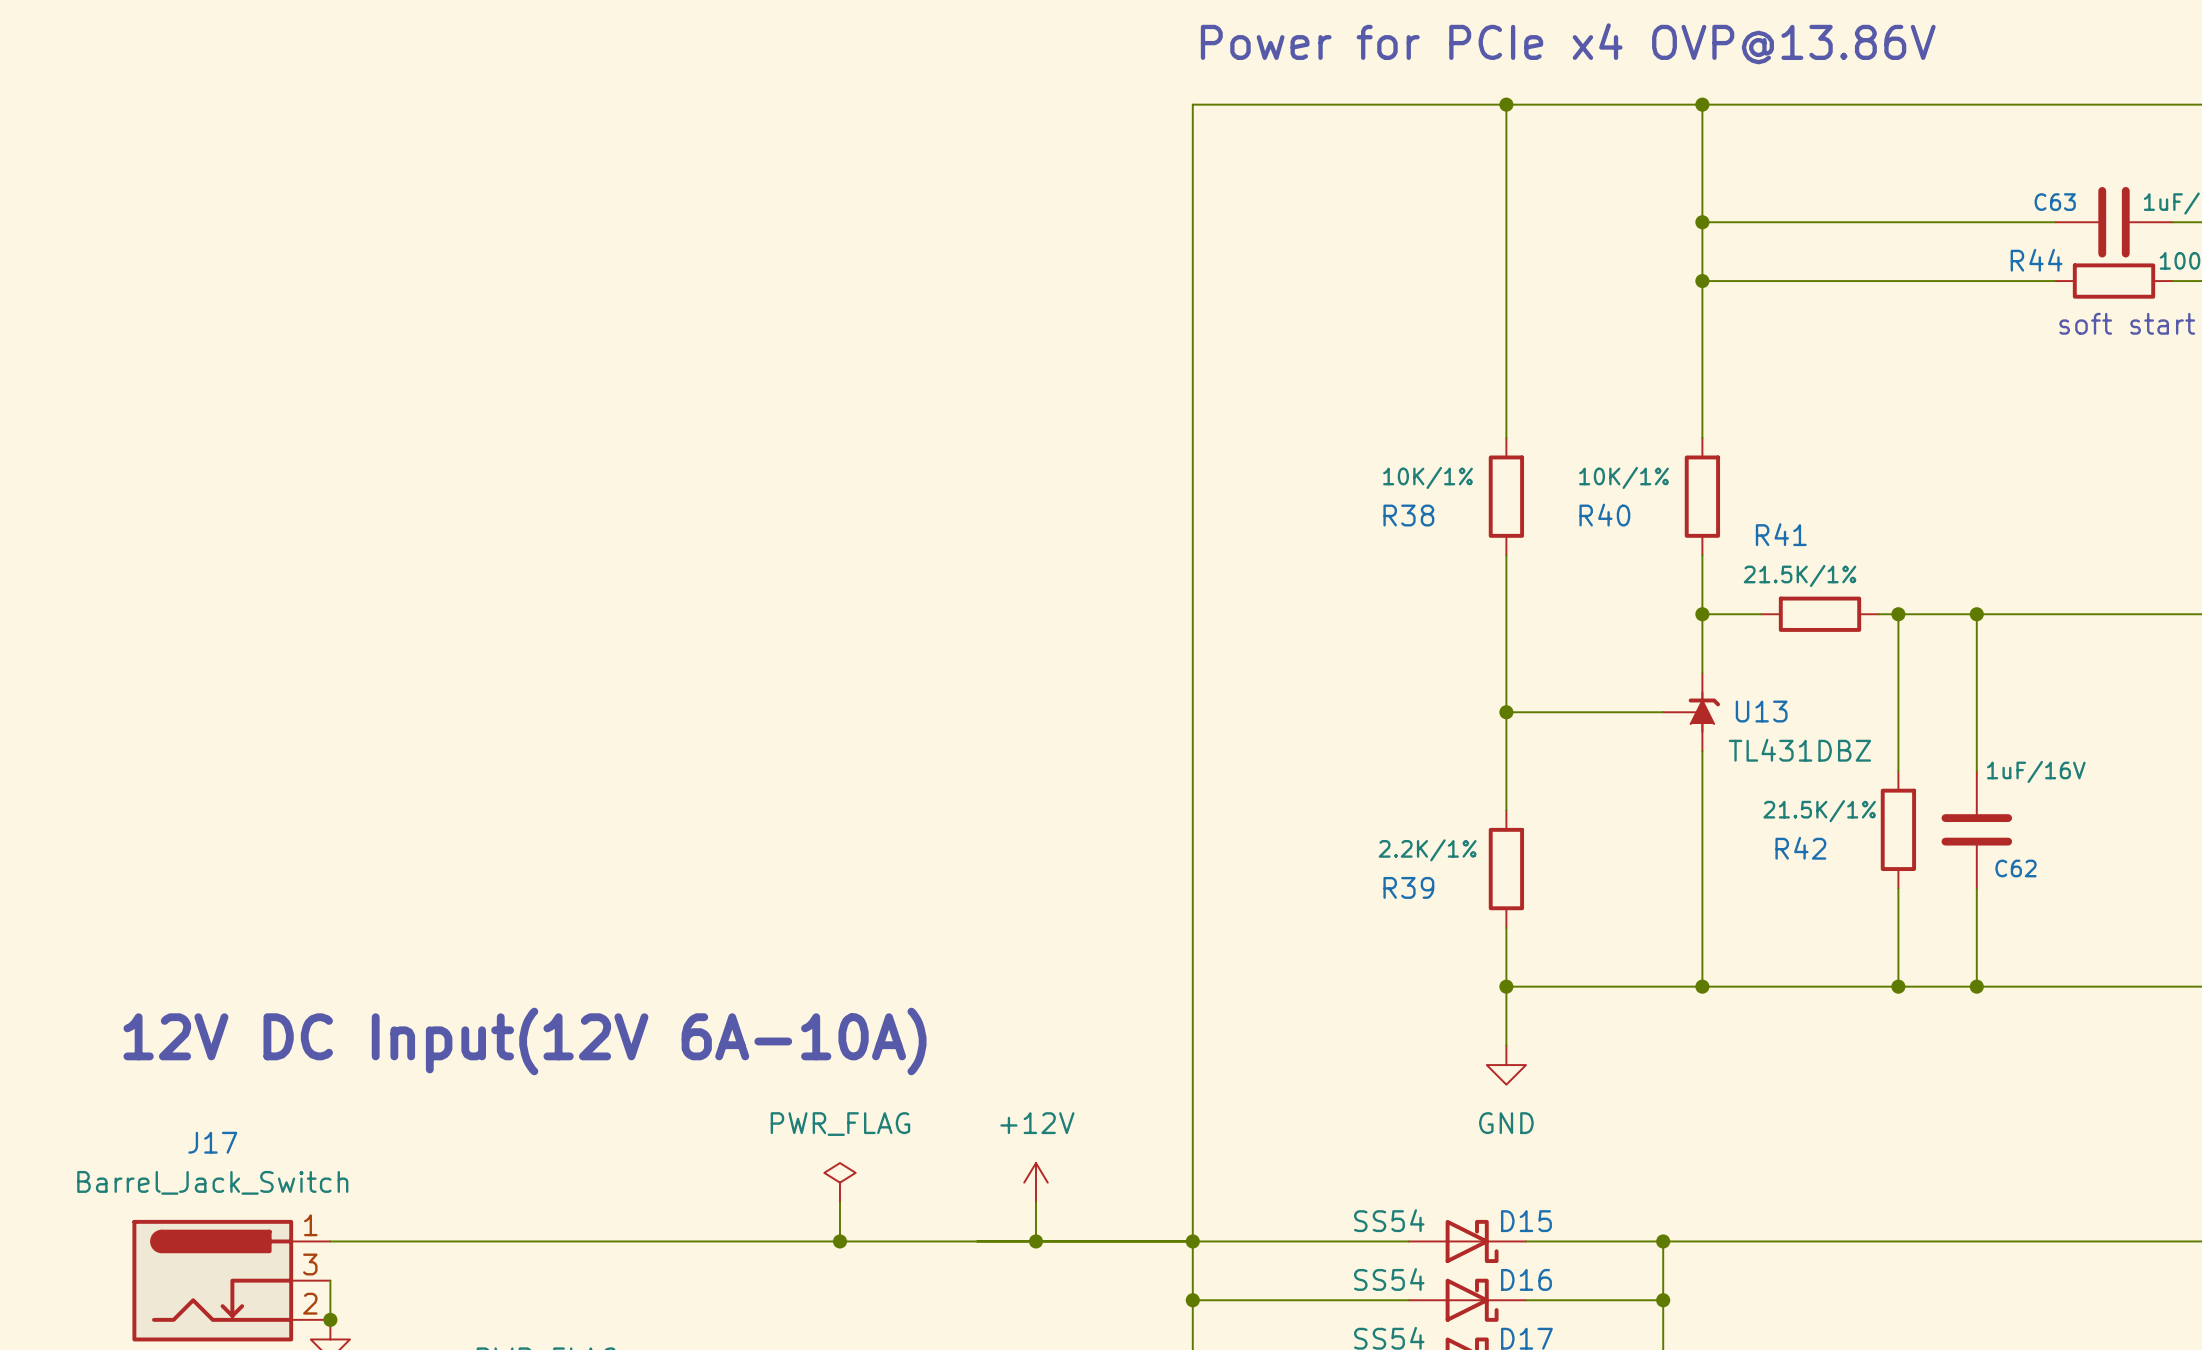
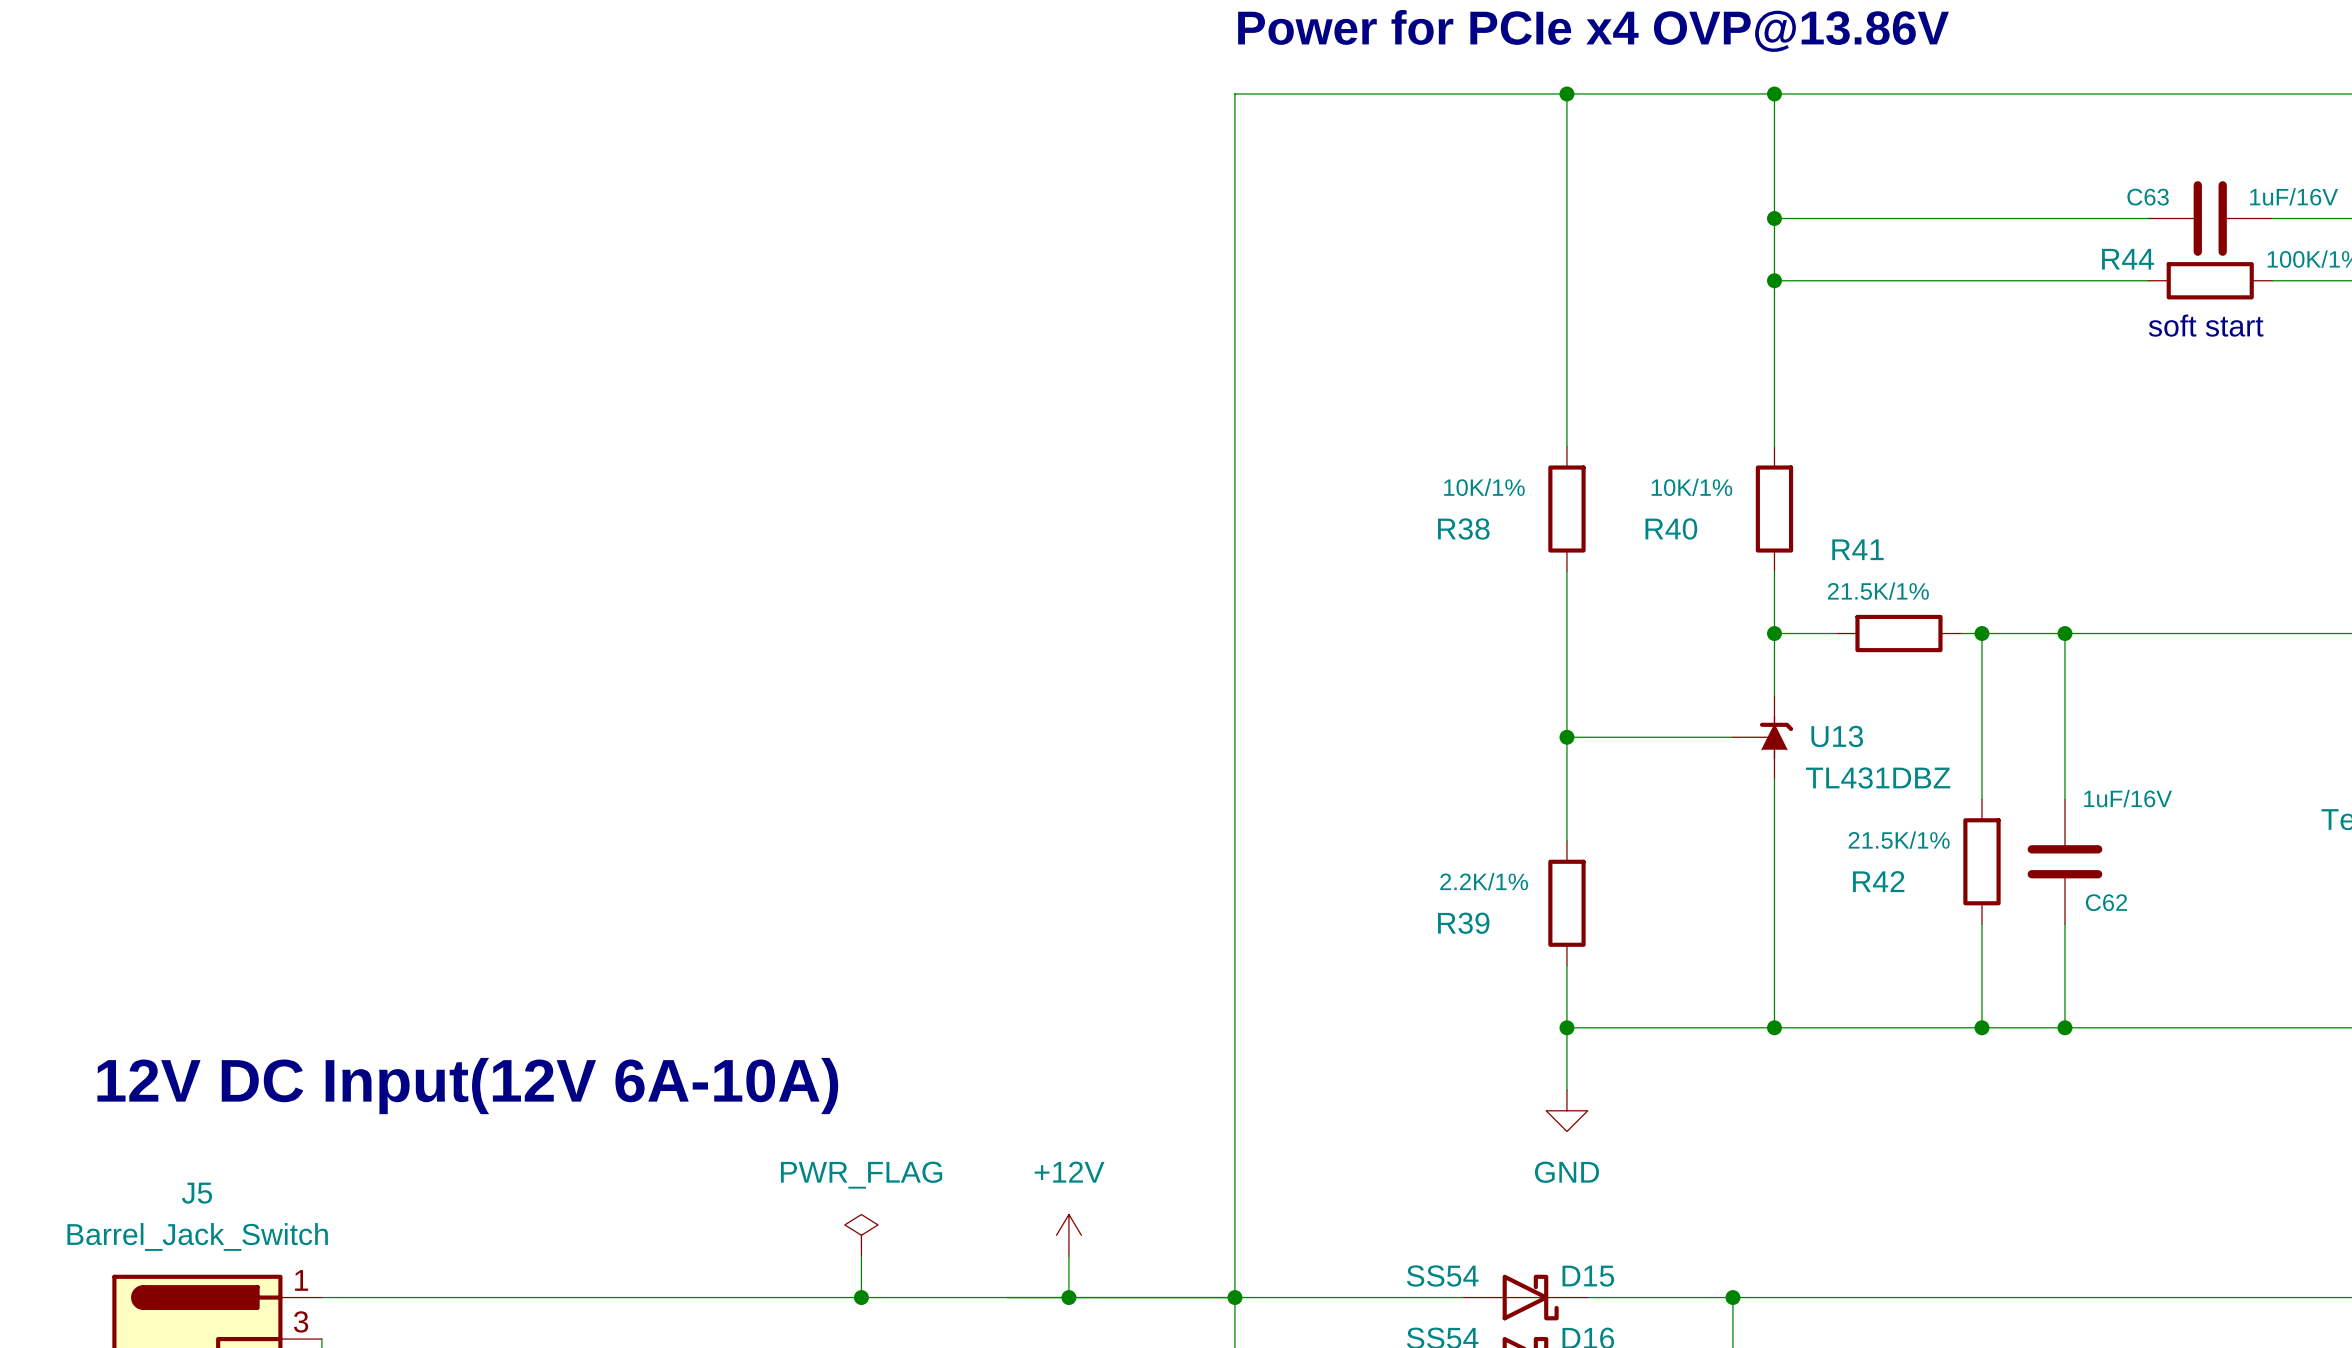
J17 name: J17 (212, 1142) -> J5 (197, 1193)

